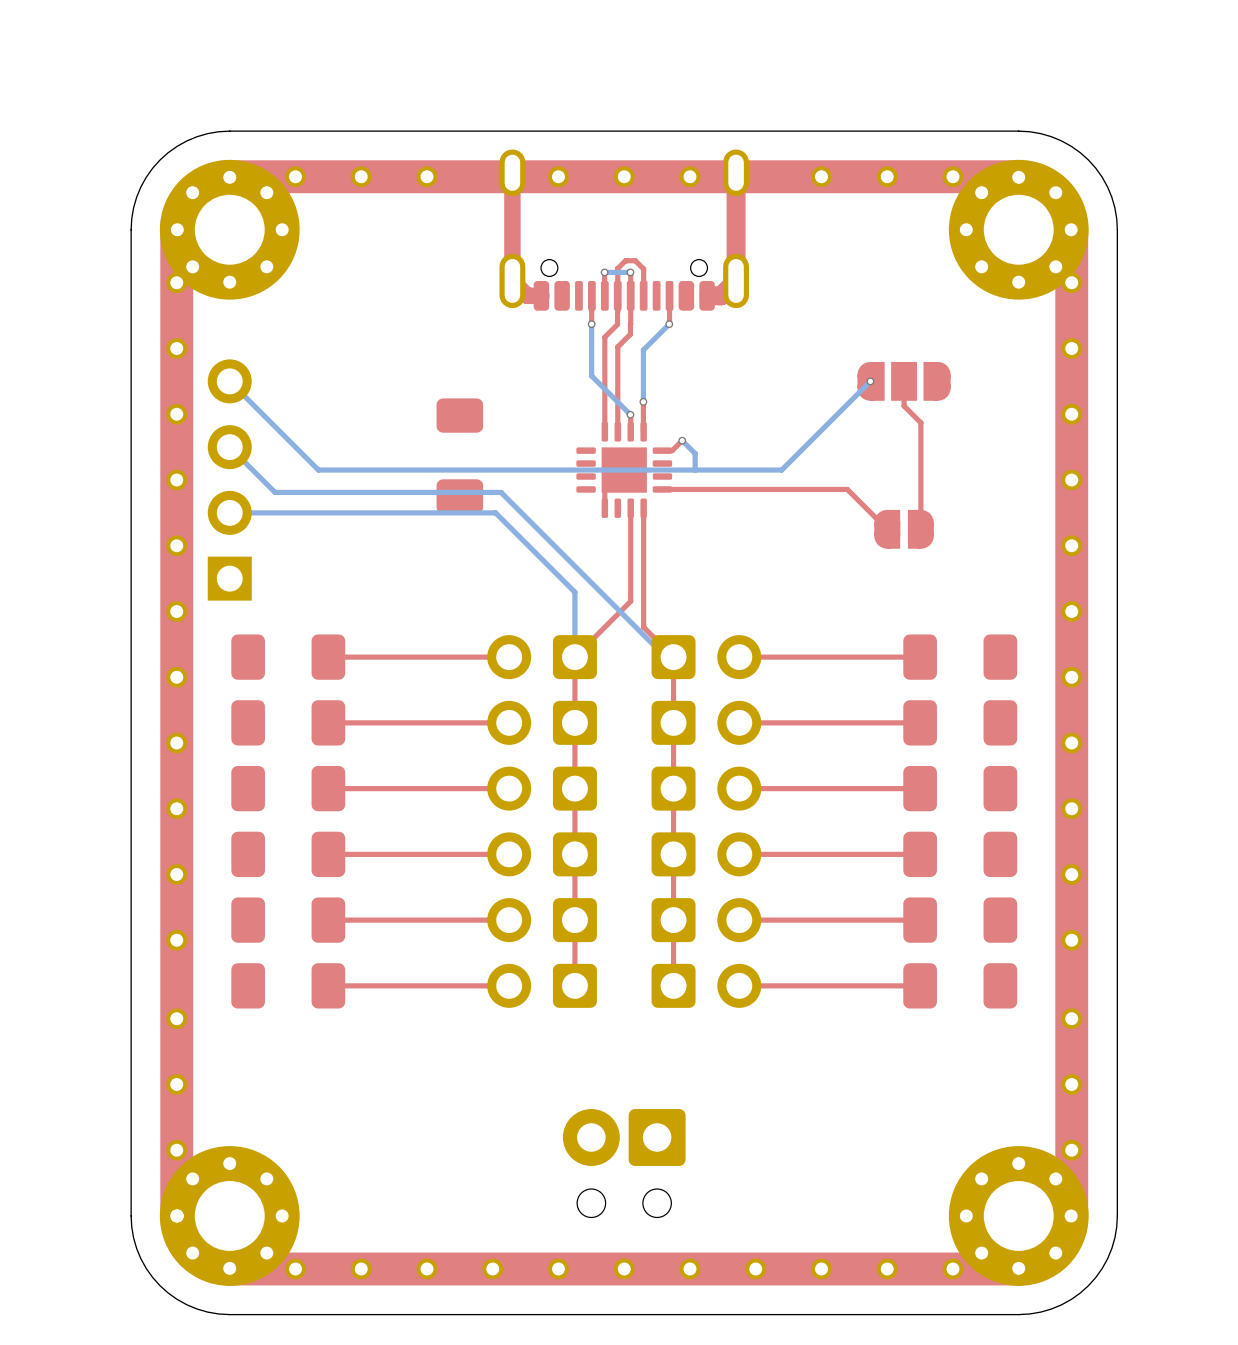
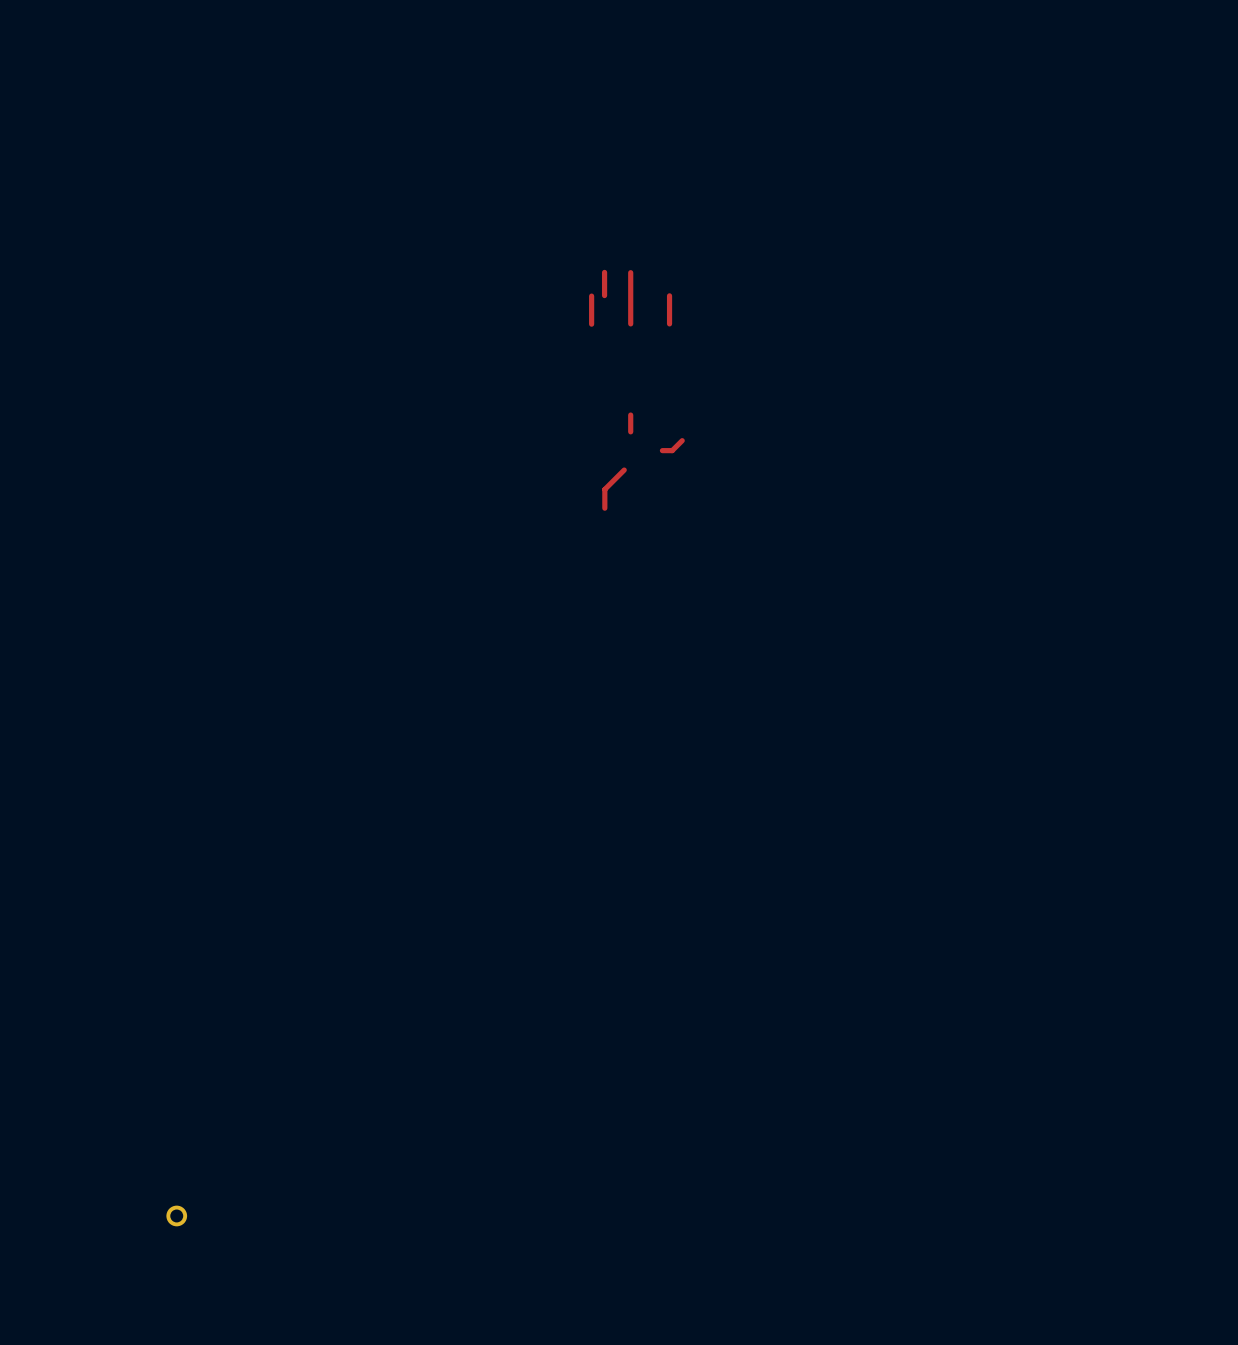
board edge: (1018, 131) (229, 131) (207, 133) (186, 140) (168, 152) (152, 168) (136, 197) (131, 229) (131, 1215) (133, 1237) (140, 1258) (152, 1277) (168, 1293) (197, 1309) (229, 1314) (1018, 1314) (1040, 1312) (1061, 1304) (1080, 1293) (1095, 1277) (1111, 1248) (1117, 1215) (1116, 218) (1107, 186) (1088, 160) (1061, 140) (1040, 133) (1018, 131) -> none
top track: (512, 172) (512, 280) (527, 295) (541, 295) -> none
top track: (736, 172) (736, 280) (721, 295) (709, 295) -> none
part: (295, 176) -> none
part: (361, 176) -> none
part: (427, 176) -> none
part: (558, 176) -> none
part: (624, 176) -> none
part: (689, 176) -> none
part: (821, 176) -> none
part: (887, 176) -> none
part: (952, 176) -> none
top track: (1018, 176) (229, 176) (209, 180) (197, 187) (187, 197) (178, 216) (176, 229) (176, 1215) (180, 1236) (187, 1248) (197, 1258) (216, 1267) (229, 1268) (1018, 1268) (1032, 1267) (1045, 1261) (1060, 1248) (1067, 1236) (1071, 1215) (1071, 229) (1067, 209) (1056, 192) (1039, 180) (1018, 176) -> none
part: (229, 229) -> none
part: (1018, 229) -> none
part: (624, 230) -> none
via: (604, 272) -> none
bottom track: (630, 272) (604, 272) -> none
via: (630, 272) -> none
part: (176, 282) -> none
part: (1071, 282) -> none
top track: (643, 295) (643, 269) (635, 260) (625, 260) (617, 268) (617, 311) -> none
top track: (617, 311) (617, 324) (604, 337) (604, 431) -> none
bottom track: (591, 324) (591, 375) (630, 414) -> none
via: (591, 324) -> none
top track: (630, 324) (630, 334) (617, 346) (617, 431) -> none
bottom track: (669, 324) (643, 350) (643, 401) -> none
via: (669, 324) -> none
part: (176, 348) -> none
part: (1071, 348) -> none
bottom track: (870, 381) (781, 470) (318, 470) (229, 381) -> none
via: (870, 381) -> none
top track: (904, 381) (904, 405) (920, 422) (920, 529) -> none
part: (904, 381) -> none
top track: (643, 401) (643, 431) -> none
via: (643, 401) -> none
part: (176, 414) -> none
via: (630, 414) -> none
part: (1071, 414) -> none
bottom track: (682, 440) (695, 453) (695, 470) -> none
via: (682, 440) -> none
bottom track: (229, 447) (275, 492) (501, 492) (665, 657) (673, 657) -> none
part: (459, 456) -> none
part: (624, 470) -> none
part: (176, 480) -> none
part: (229, 480) -> none
part: (1071, 480) -> none
top track: (662, 489) (847, 489) (887, 529) -> none
top track: (630, 508) (630, 601) (574, 657) (574, 985) -> none
top track: (643, 508) (643, 627) (673, 657) (673, 985) -> none
bottom track: (229, 512) (495, 512) (574, 592) (574, 657) -> none
part: (904, 529) -> none
part: (176, 545) -> none
part: (1071, 545) -> none
part: (176, 611) -> none
part: (1071, 611) -> none
part: (288, 657) -> none
top track: (509, 657) (328, 657) -> none
top track: (920, 657) (739, 657) -> none
part: (960, 657) -> none
part: (176, 677) -> none
part: (1071, 677) -> none
part: (288, 722) -> none
top track: (509, 722) (328, 722) -> none
top track: (920, 722) (739, 722) -> none
part: (960, 722) -> none
part: (176, 743) -> none
part: (1071, 743) -> none
part: (288, 788) -> none
top track: (509, 788) (328, 788) -> none
top track: (920, 788) (739, 788) -> none
part: (960, 788) -> none
part: (176, 808) -> none
part: (1071, 808) -> none
part: (542, 821) -> none
part: (706, 821) -> none
part: (288, 854) -> none
top track: (509, 854) (328, 854) -> none
top track: (920, 854) (739, 854) -> none
part: (960, 854) -> none
part: (176, 874) -> none
part: (1071, 874) -> none
part: (288, 920) -> none
top track: (509, 920) (328, 920) -> none
top track: (920, 920) (739, 920) -> none
part: (960, 920) -> none
part: (176, 940) -> none
part: (1071, 940) -> none
part: (288, 985) -> none
top track: (509, 985) (328, 985) -> none
top track: (920, 985) (739, 985) -> none
part: (960, 985) -> none
part: (176, 1018) -> none
part: (1071, 1018) -> none
part: (176, 1084) -> none
part: (1071, 1084) -> none
part: (176, 1150) -> none
part: (1071, 1150) -> none
part: (624, 1163) -> none
part: (229, 1215) -> none
part: (1018, 1215) -> none
part: (295, 1268) -> none
part: (361, 1268) -> none
part: (427, 1268) -> none
part: (492, 1268) -> none
part: (558, 1268) -> none
part: (624, 1268) -> none
part: (689, 1268) -> none
part: (755, 1268) -> none
part: (821, 1268) -> none
part: (887, 1268) -> none
part: (952, 1268) -> none

